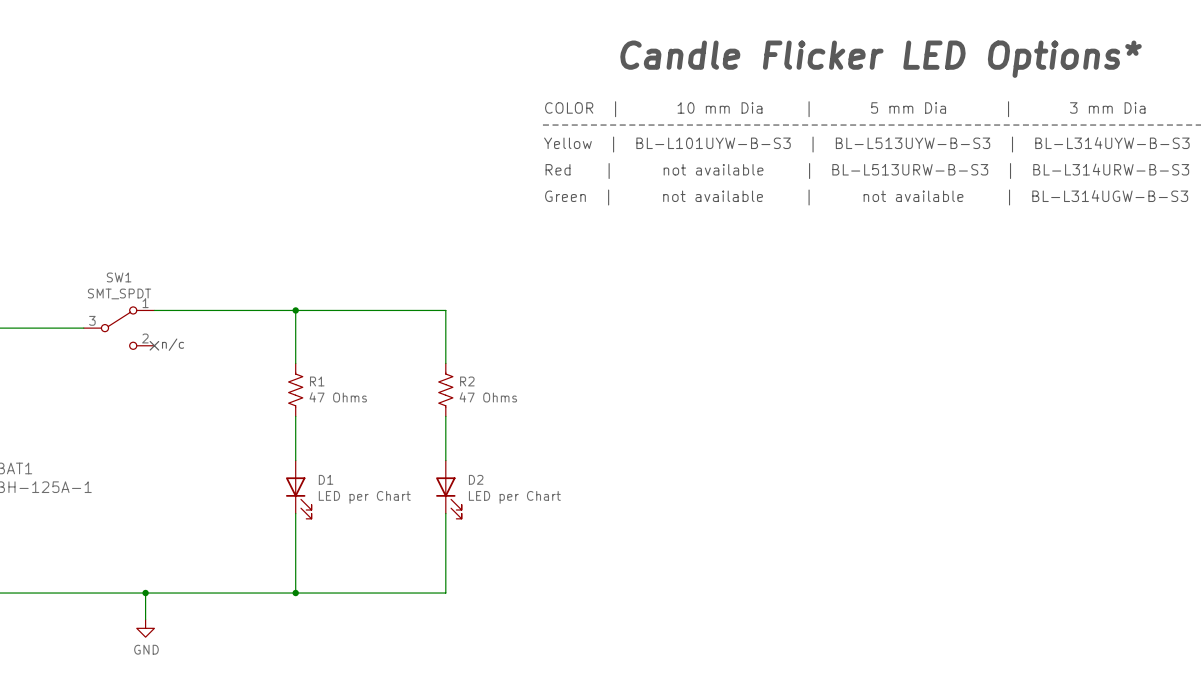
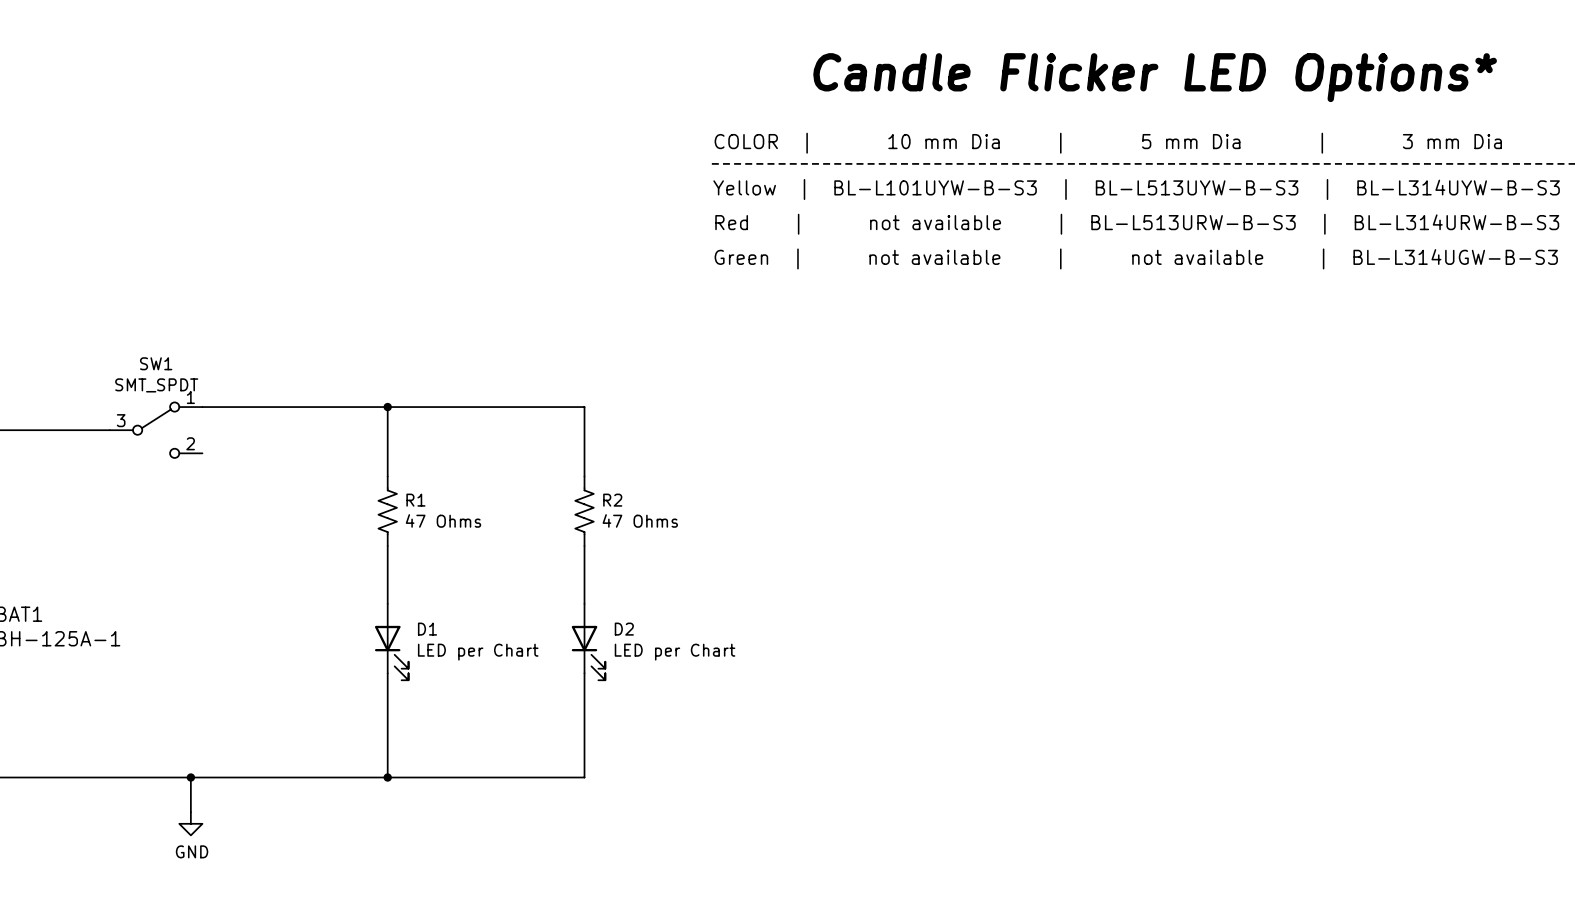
text: n/c (173, 344) -> none
no-connect mark: (154, 345) -> none

